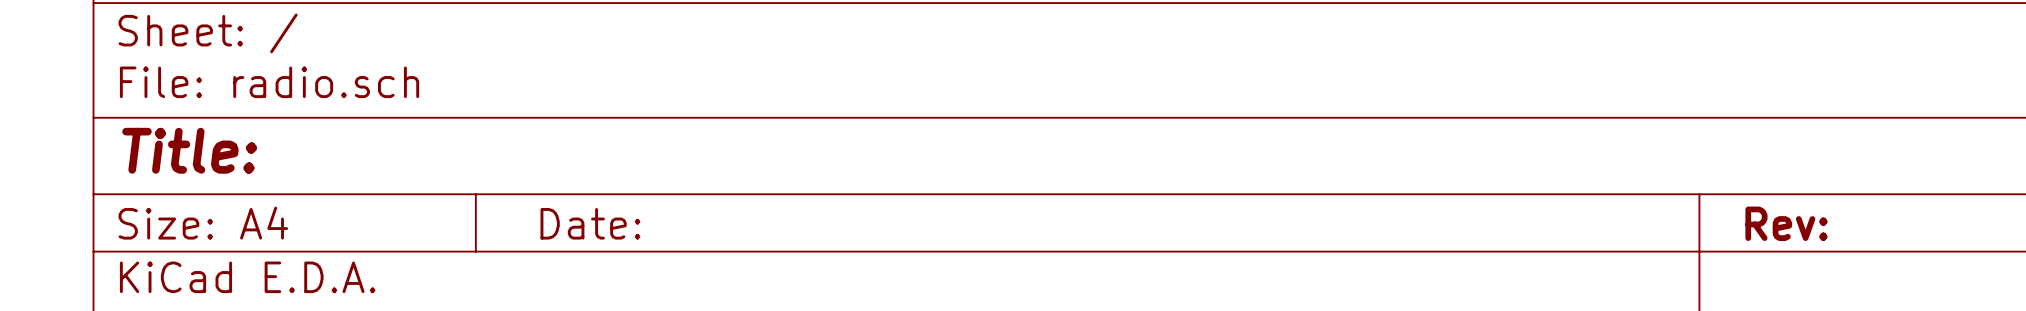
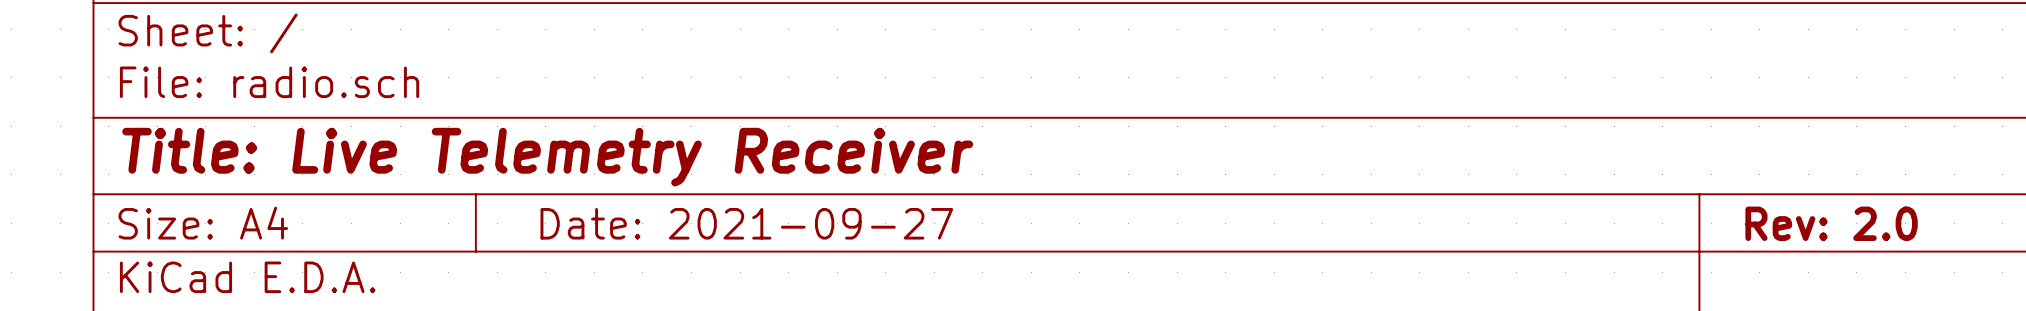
title block: Title: (189, 150) -> Title: Live Telemetry Receiver (547, 157)
title block: Date: (590, 223) -> Date: 2021-09-27 (746, 223)
title block: Rev: (1786, 223) -> Rev: 2.0 (1831, 223)

